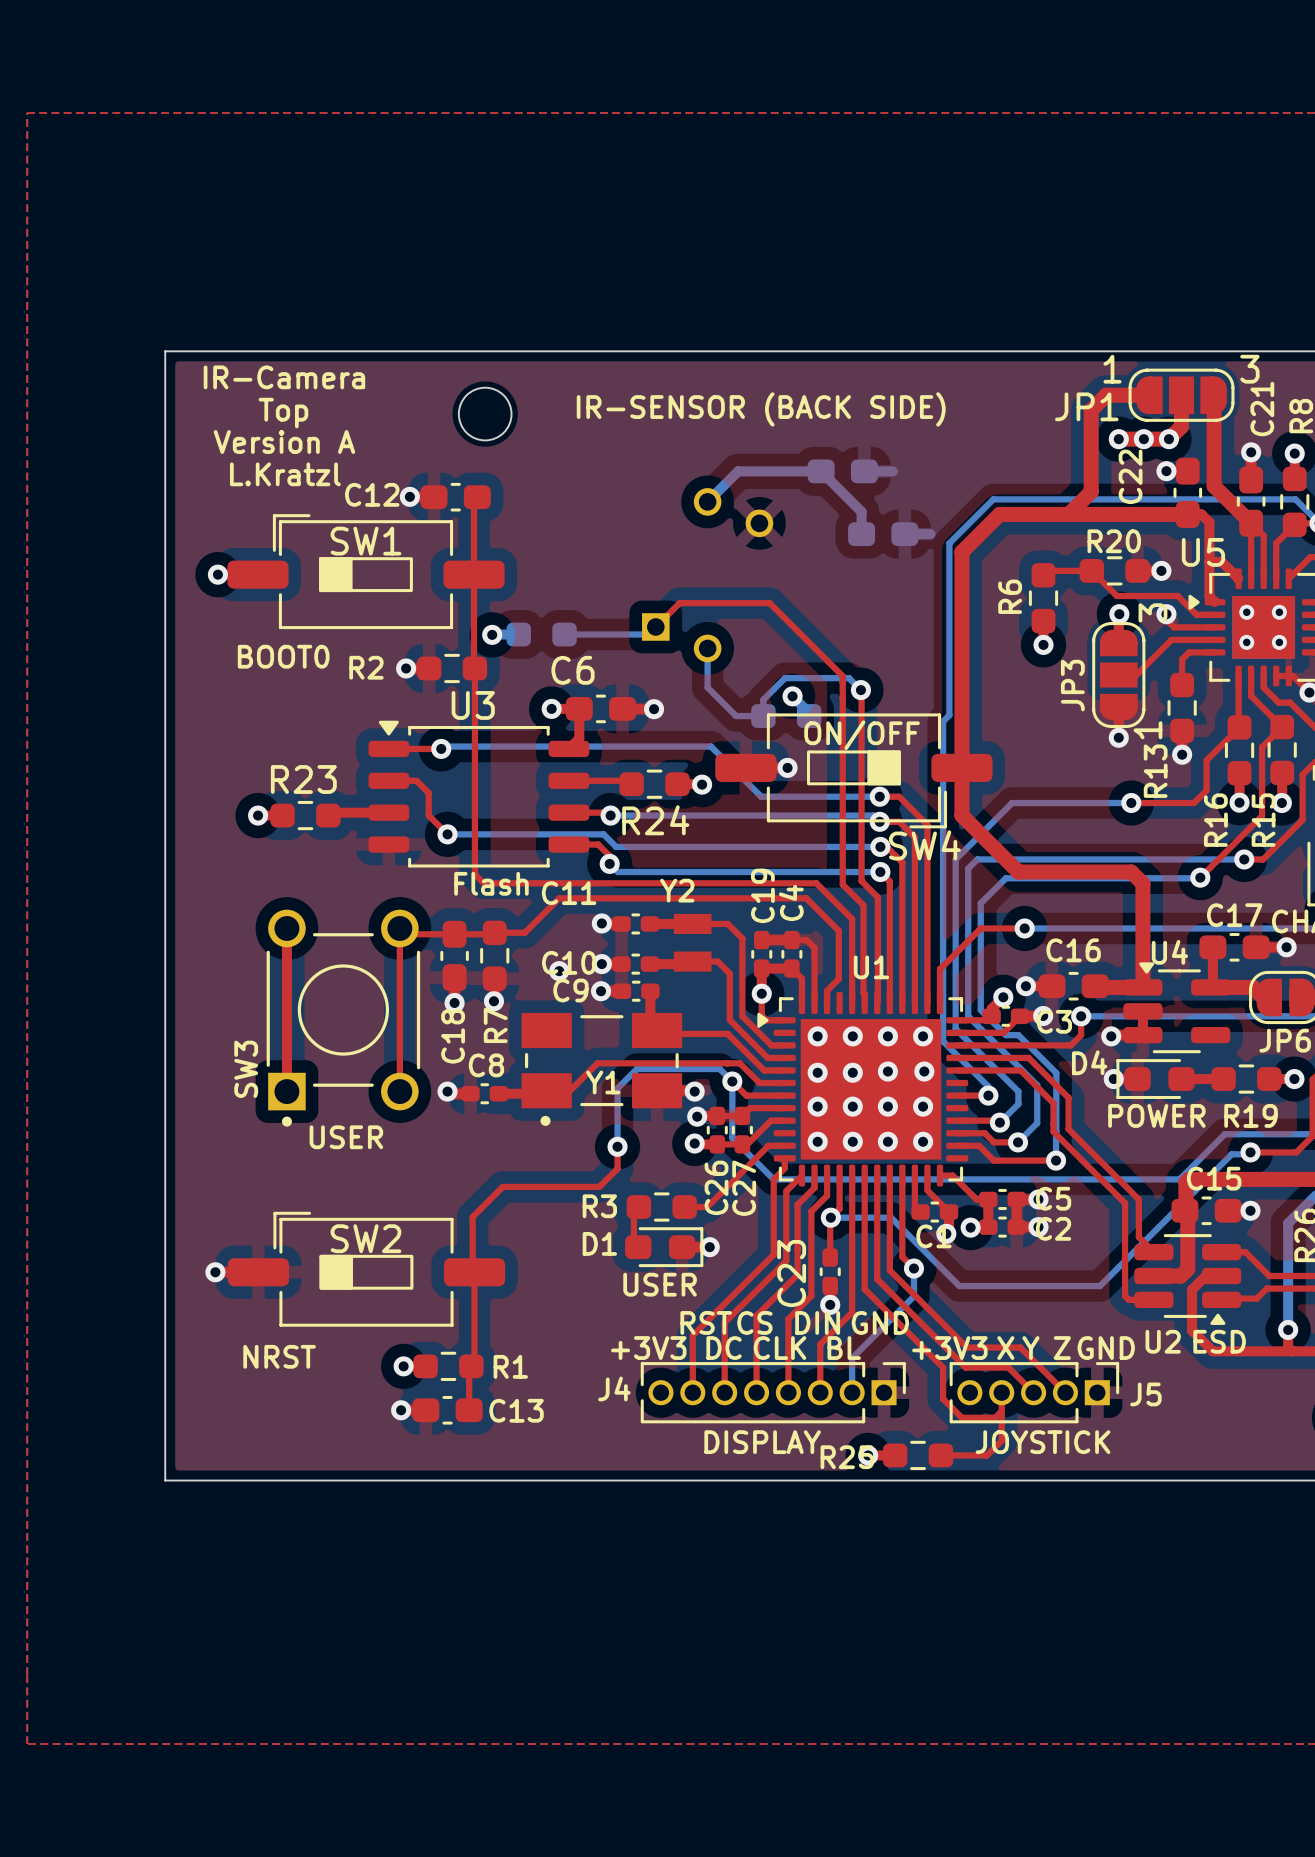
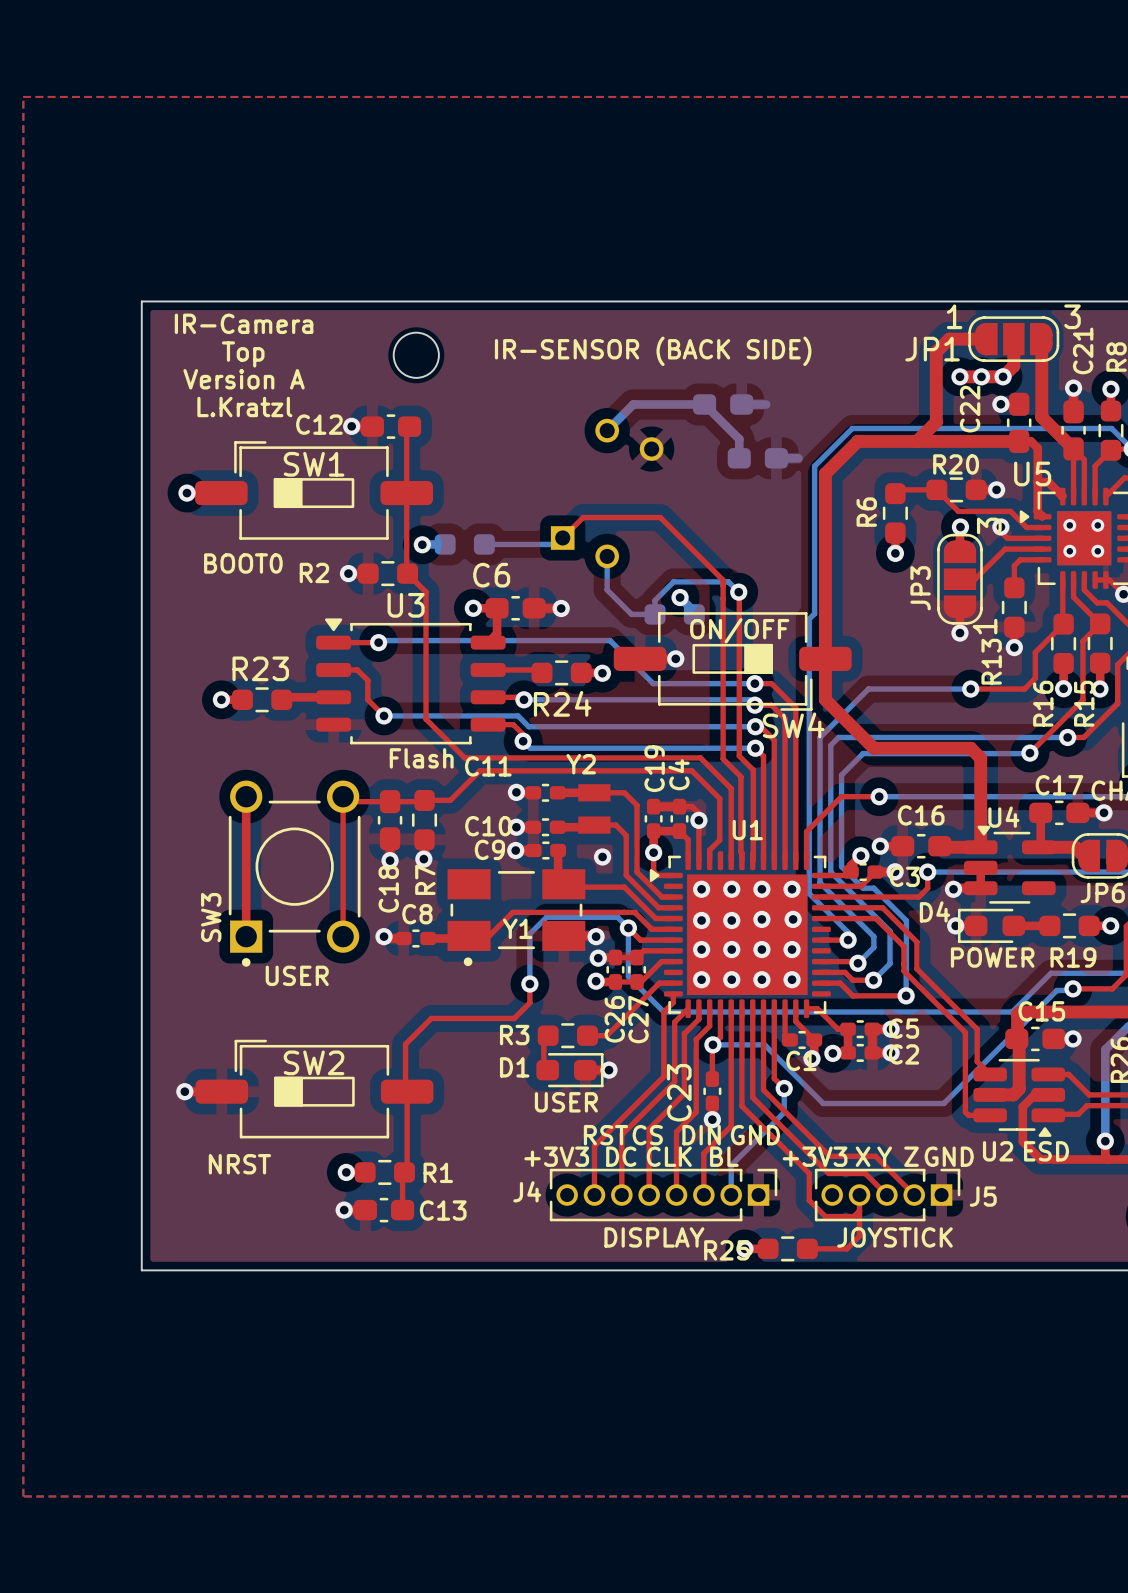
top track: (474, 668) (474, 874) (483, 883) (541, 883) -> (407, 573) (426, 592) (426, 719) (464, 757)
via: none -> (698, 820)
via: (559, 971) -> none
via: none -> (602, 856)

